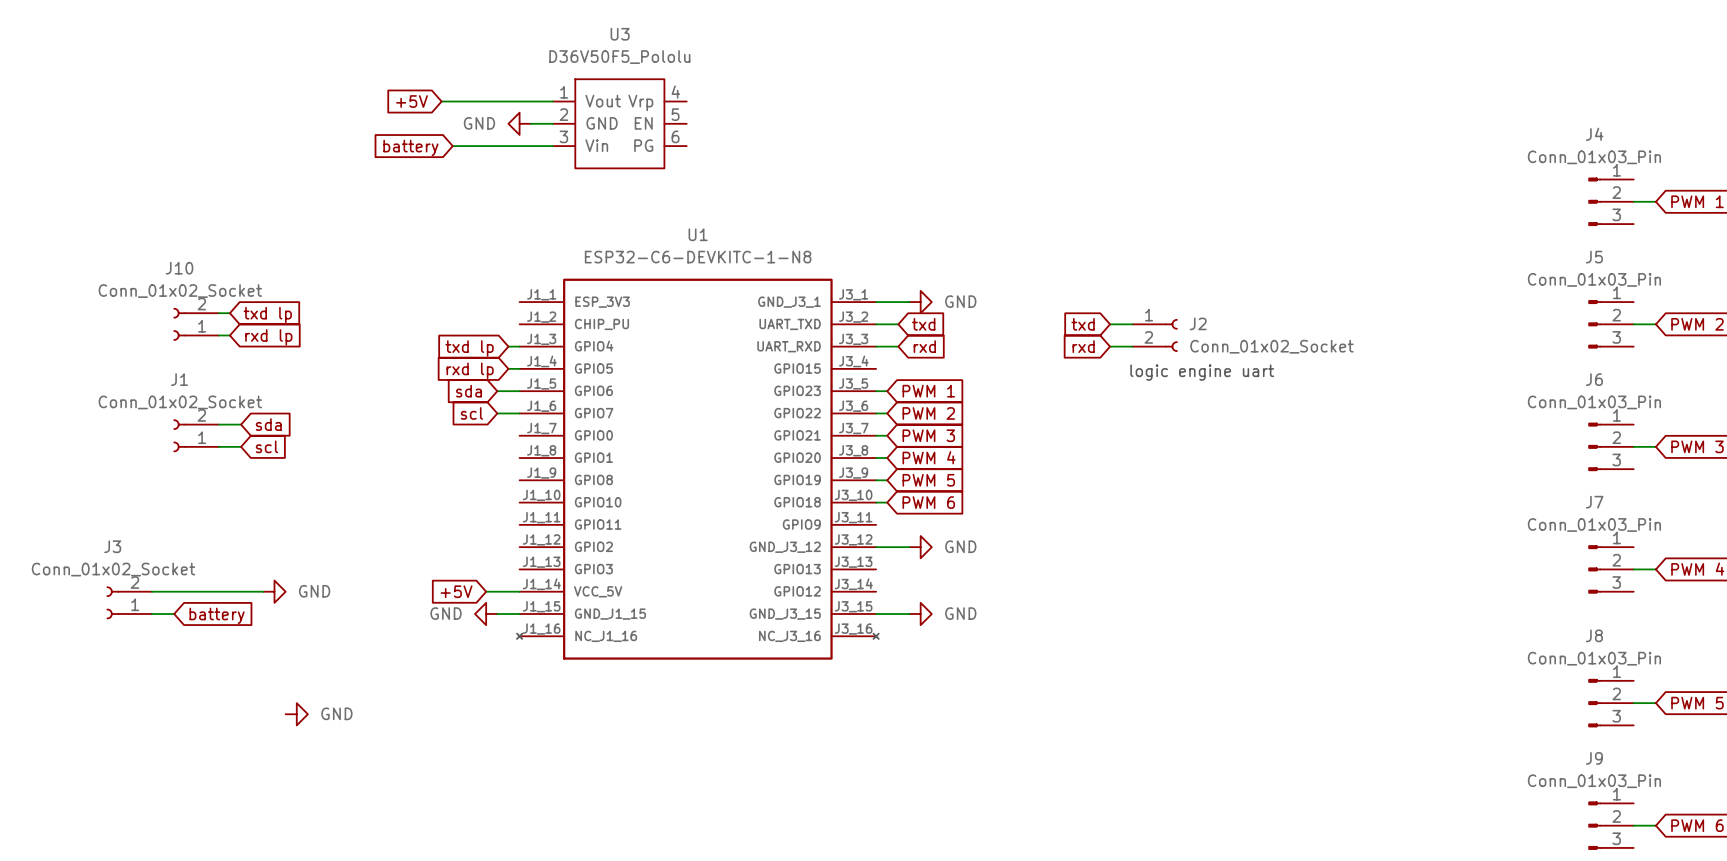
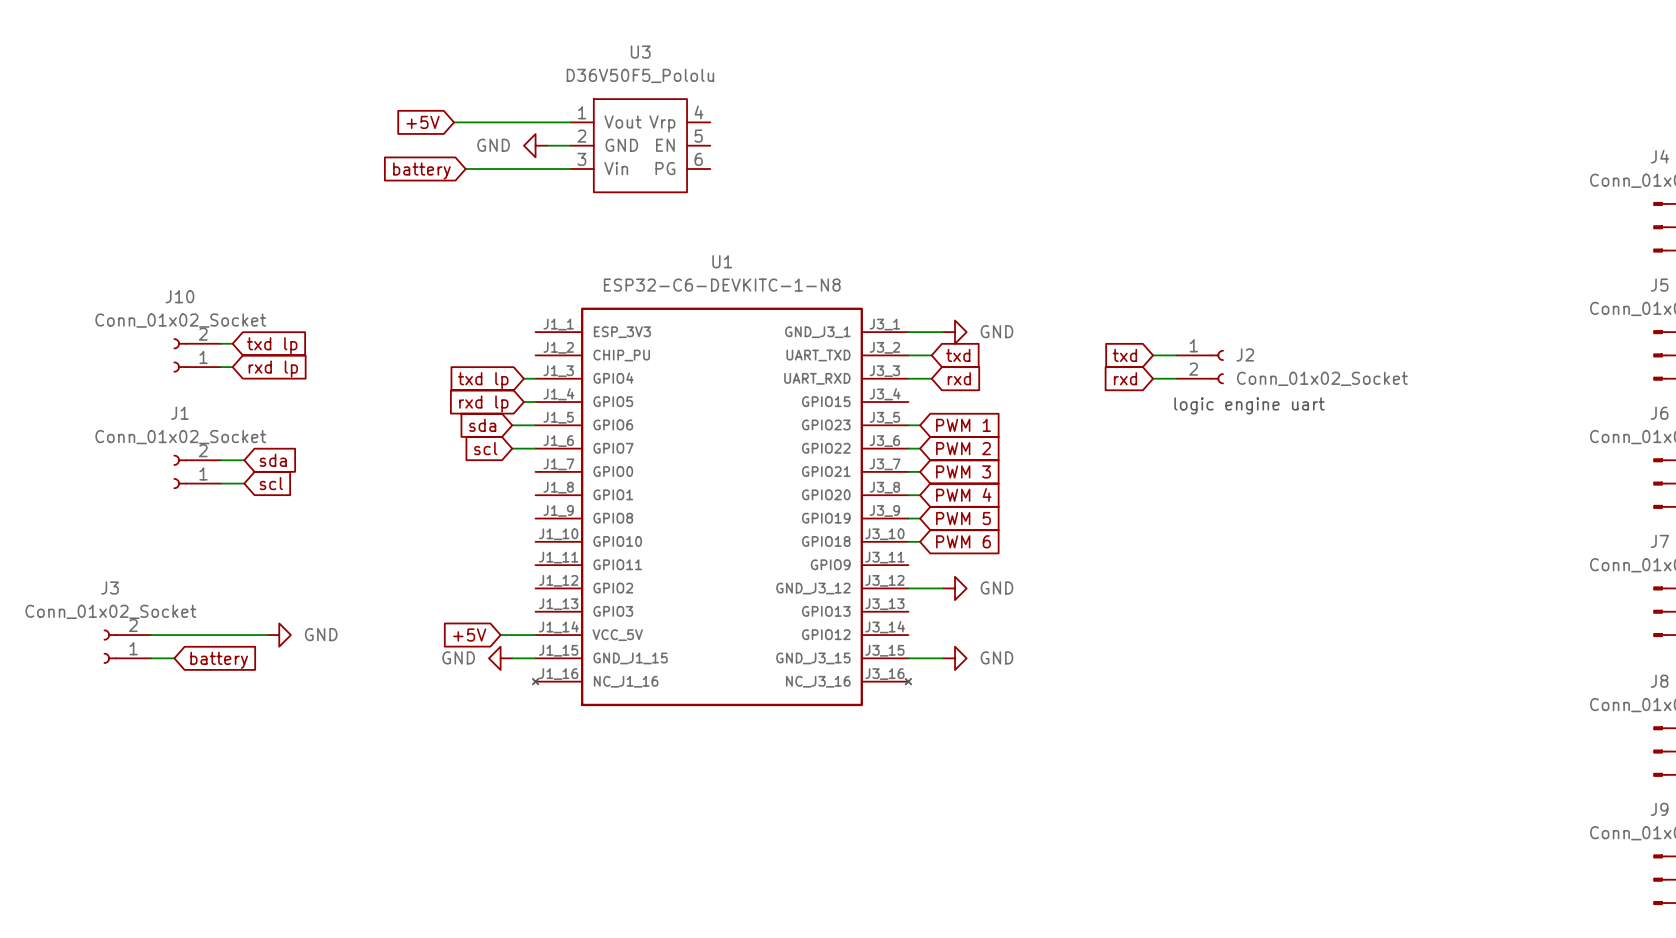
power symbol: GND (296, 714) -> none

